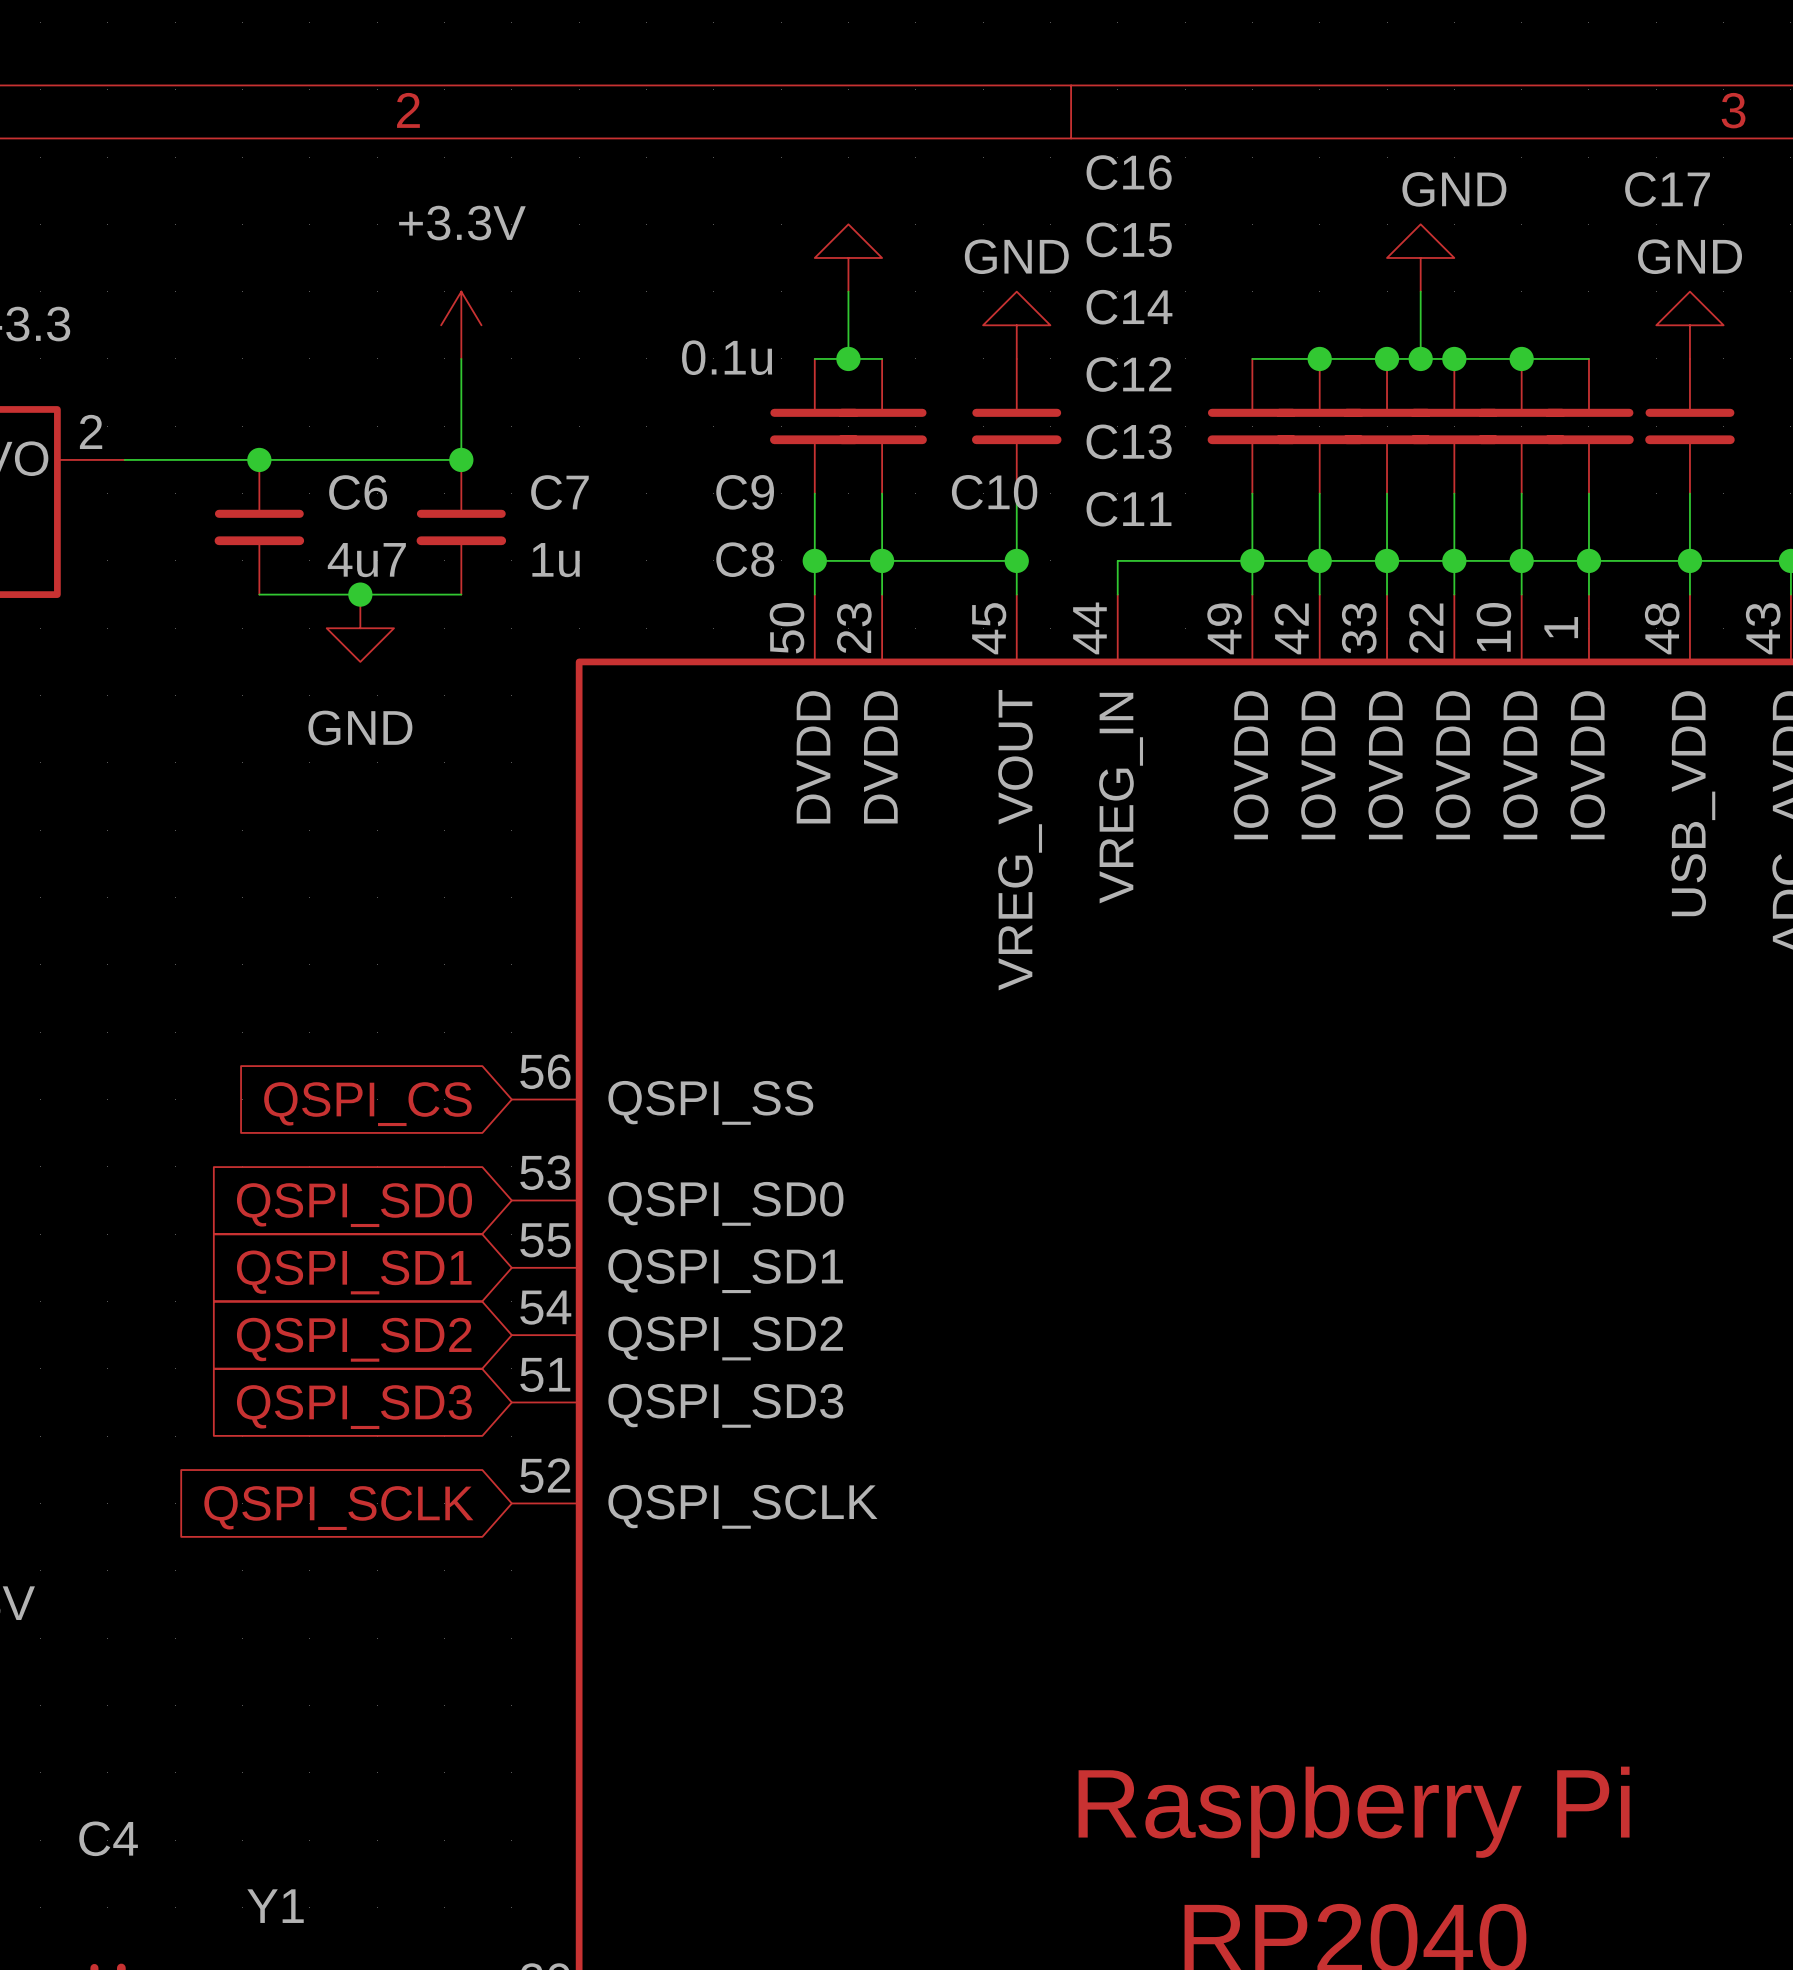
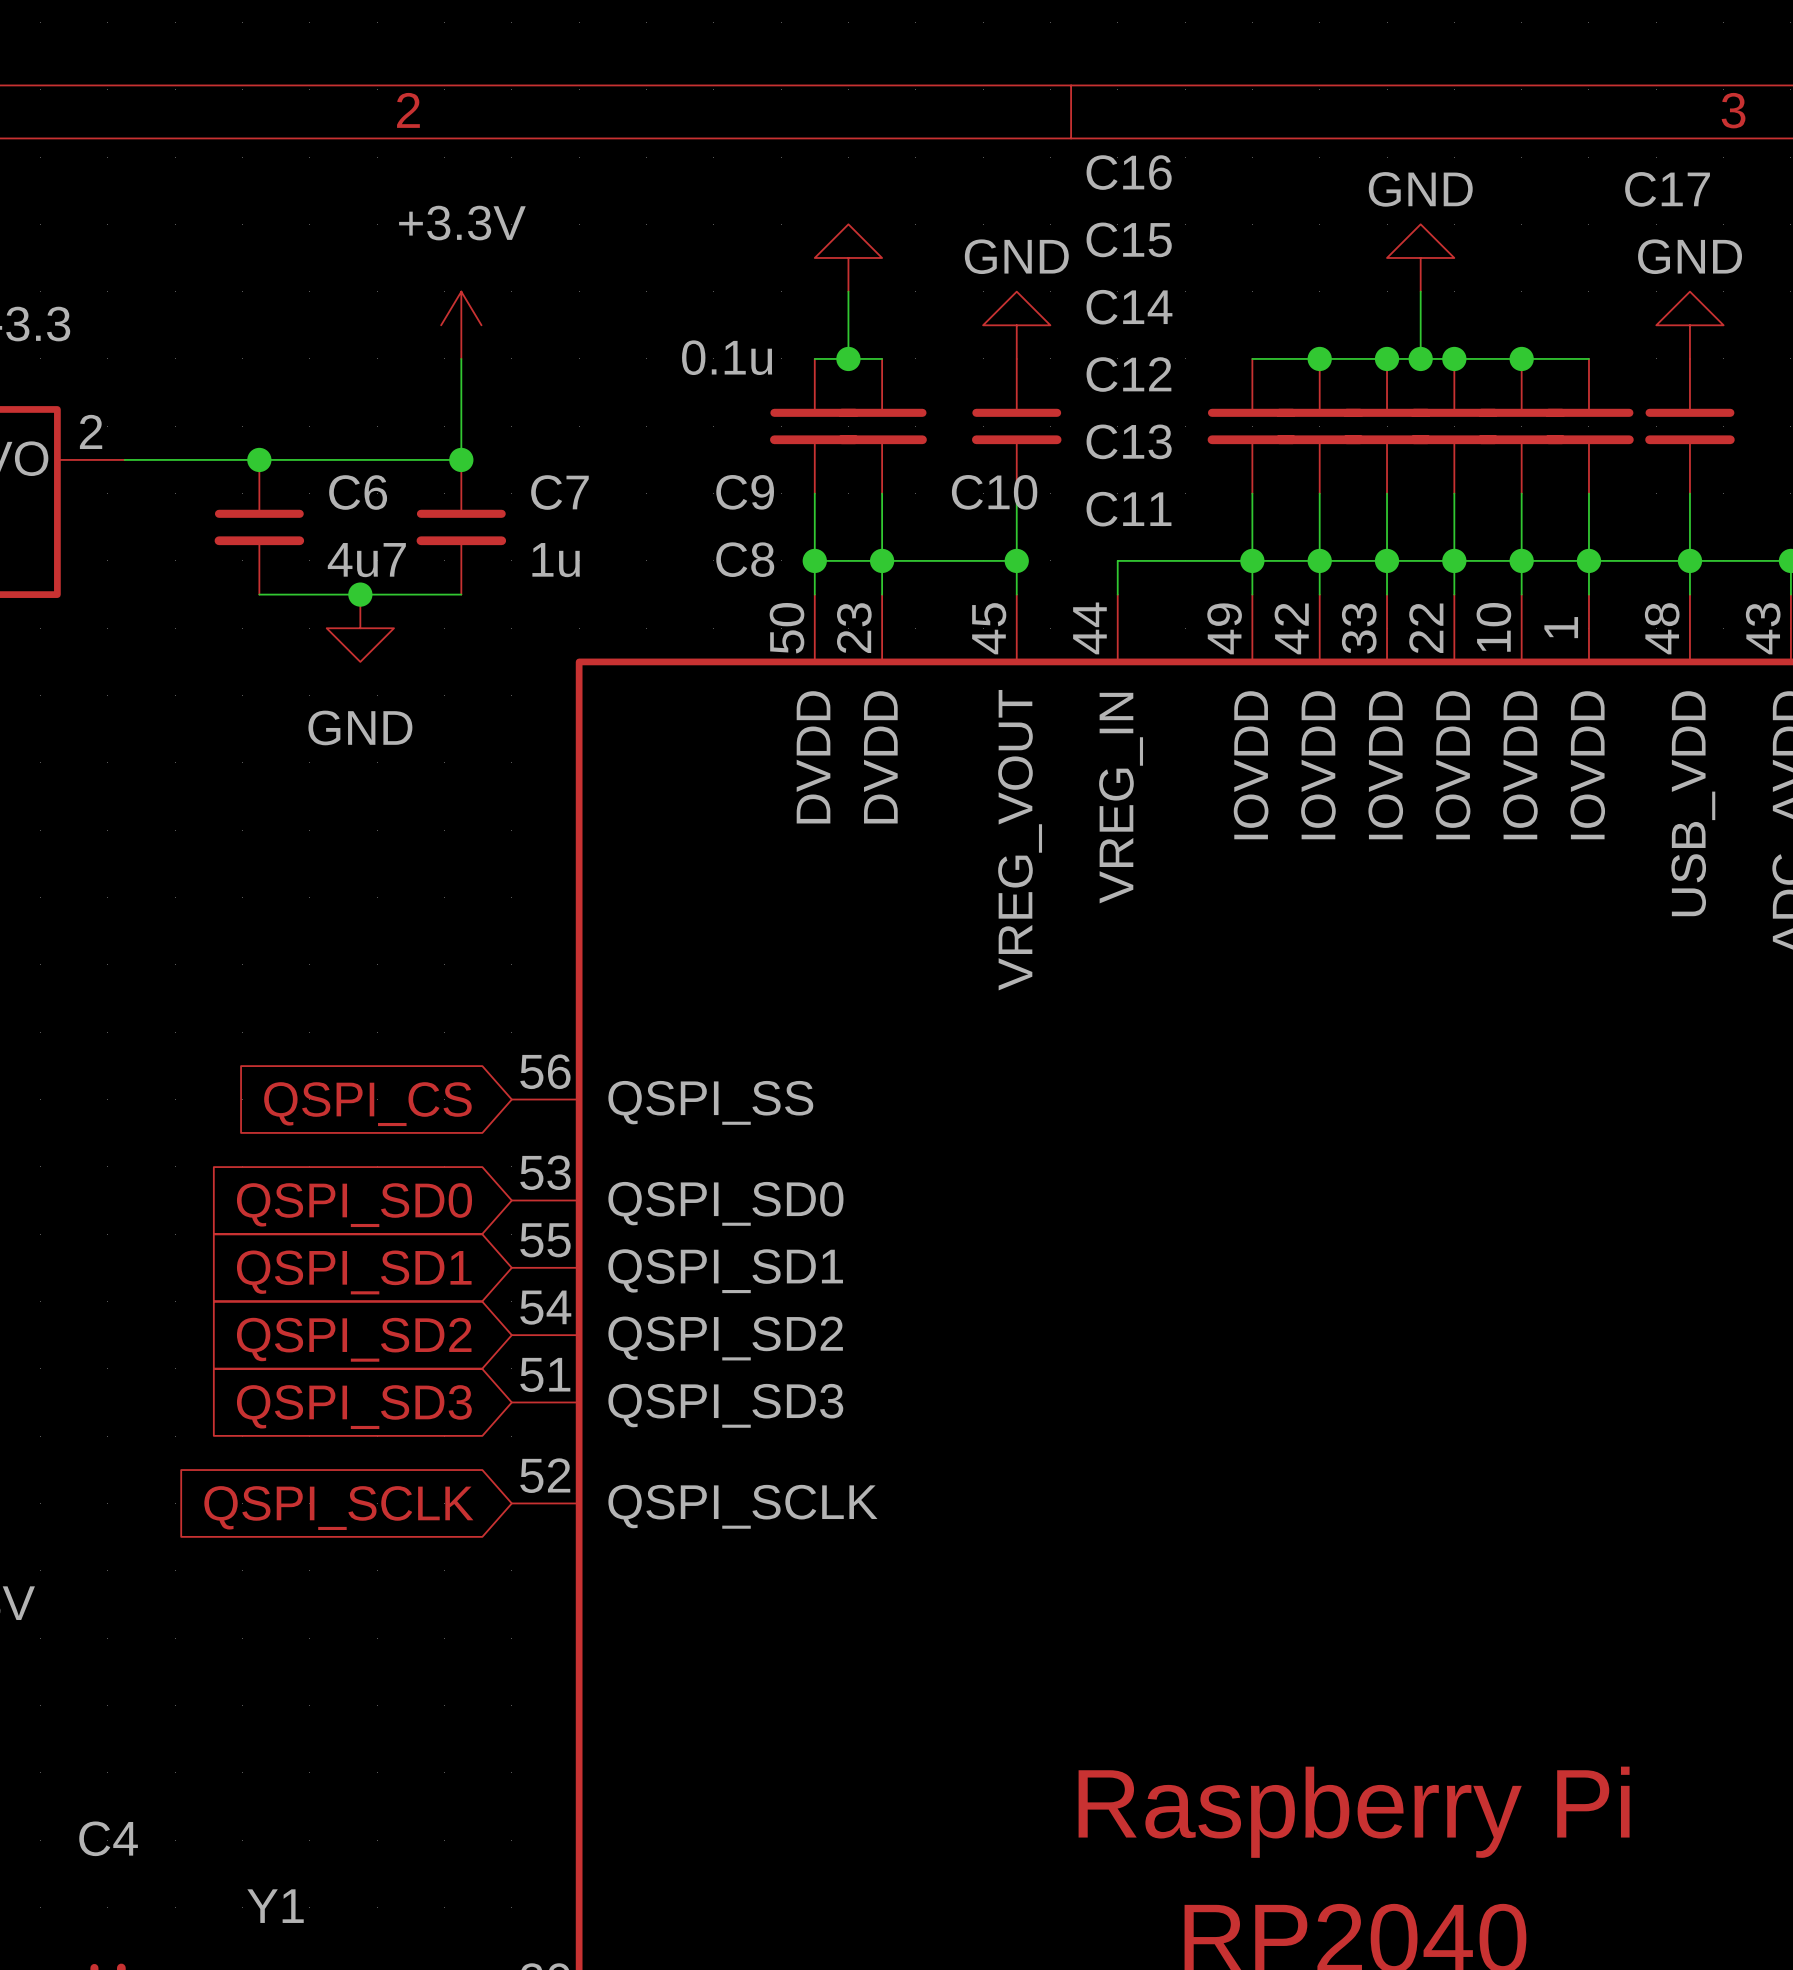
power symbol text position: GND (1454, 189) -> GND (1420, 189)

